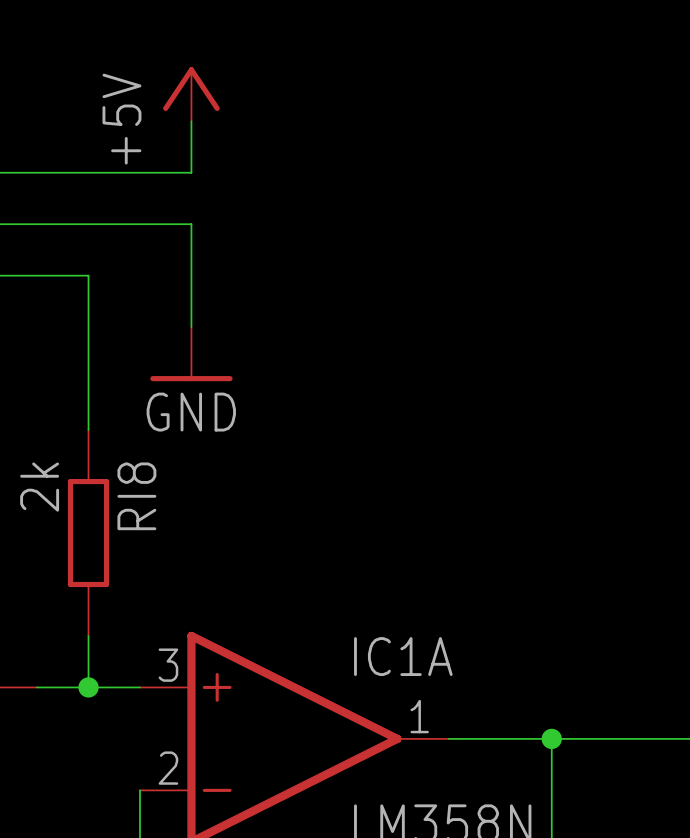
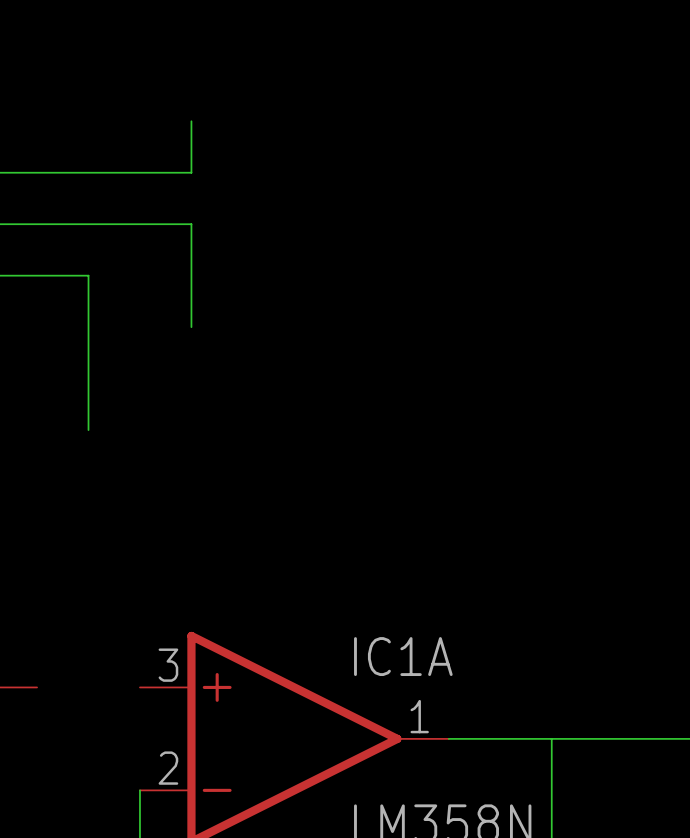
power symbol: +5V (191, 94) -> none
power symbol: GND (191, 354) -> none
RI8: 2k (88, 533) -> none
wire: (88, 635) (88, 687) -> none
wire: (37, 687) (139, 687) -> none
junction: (88, 687) -> none
junction: (551, 738) -> none

